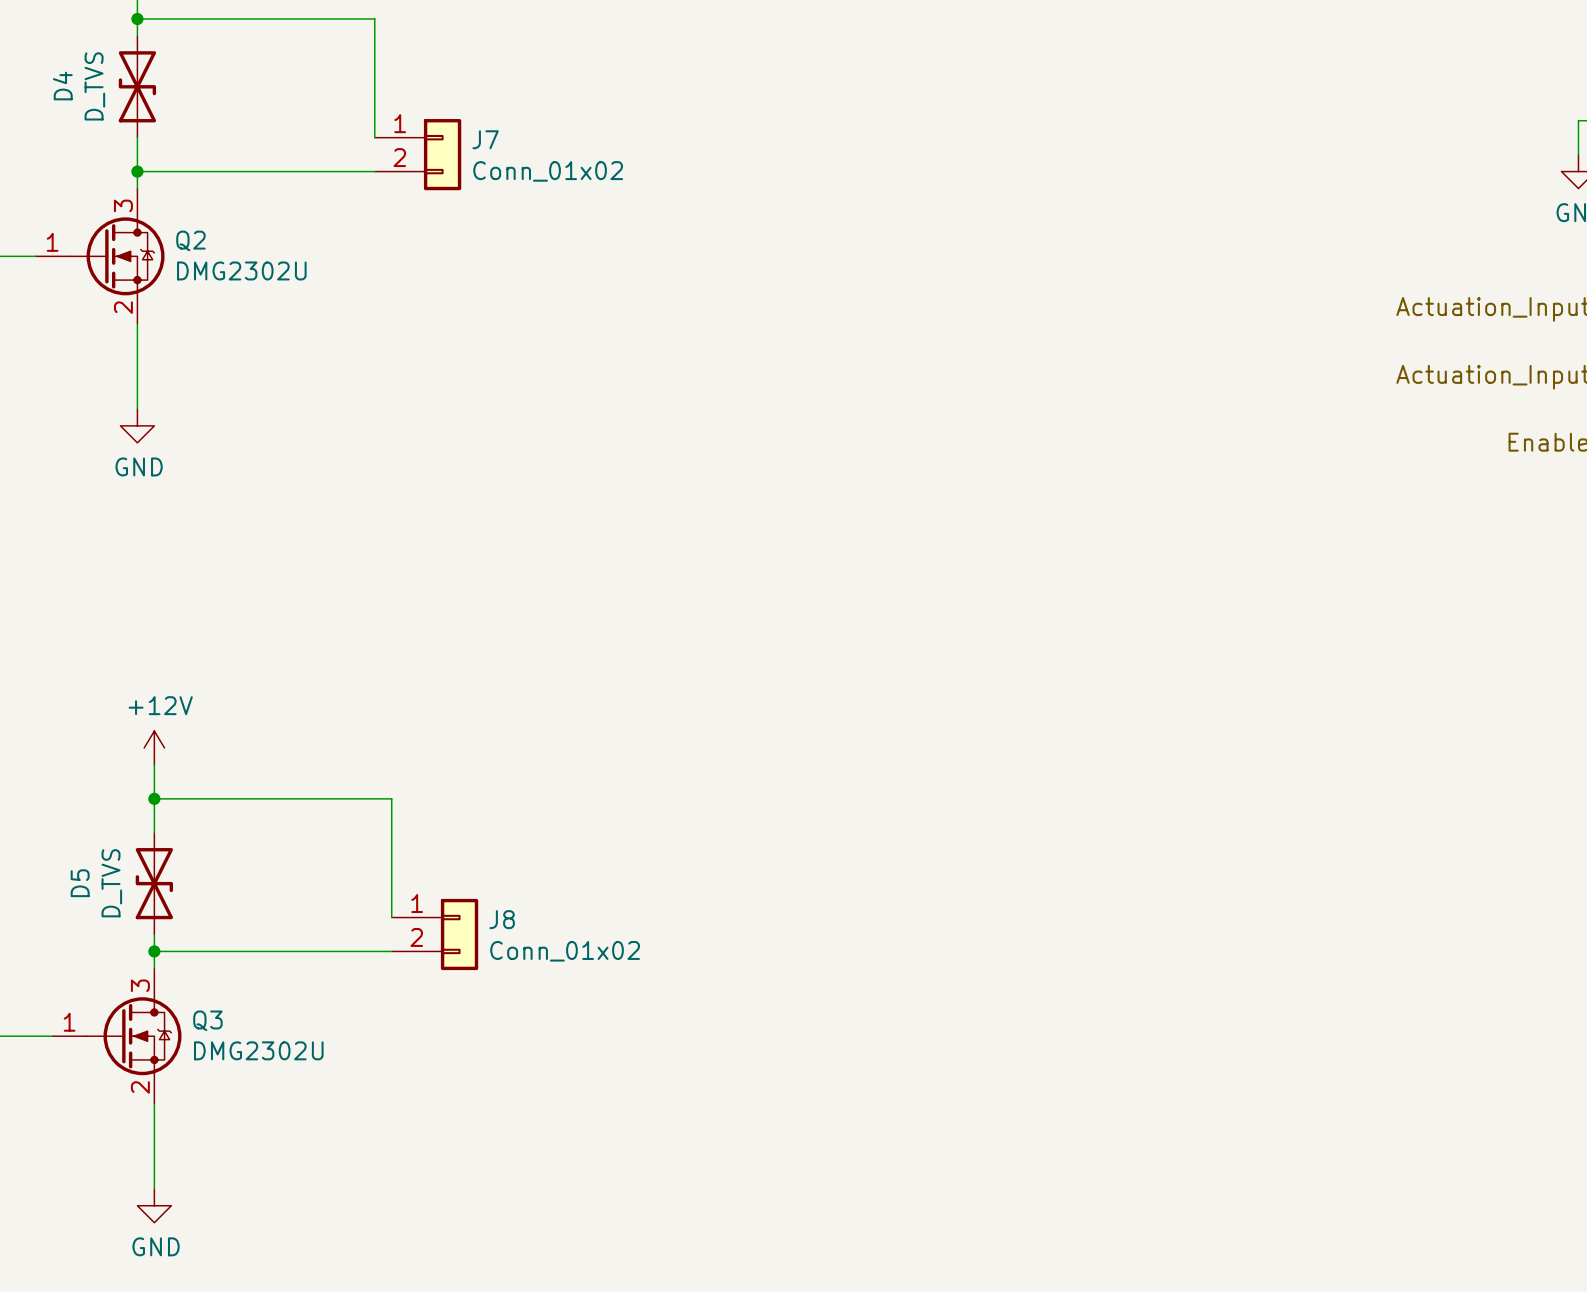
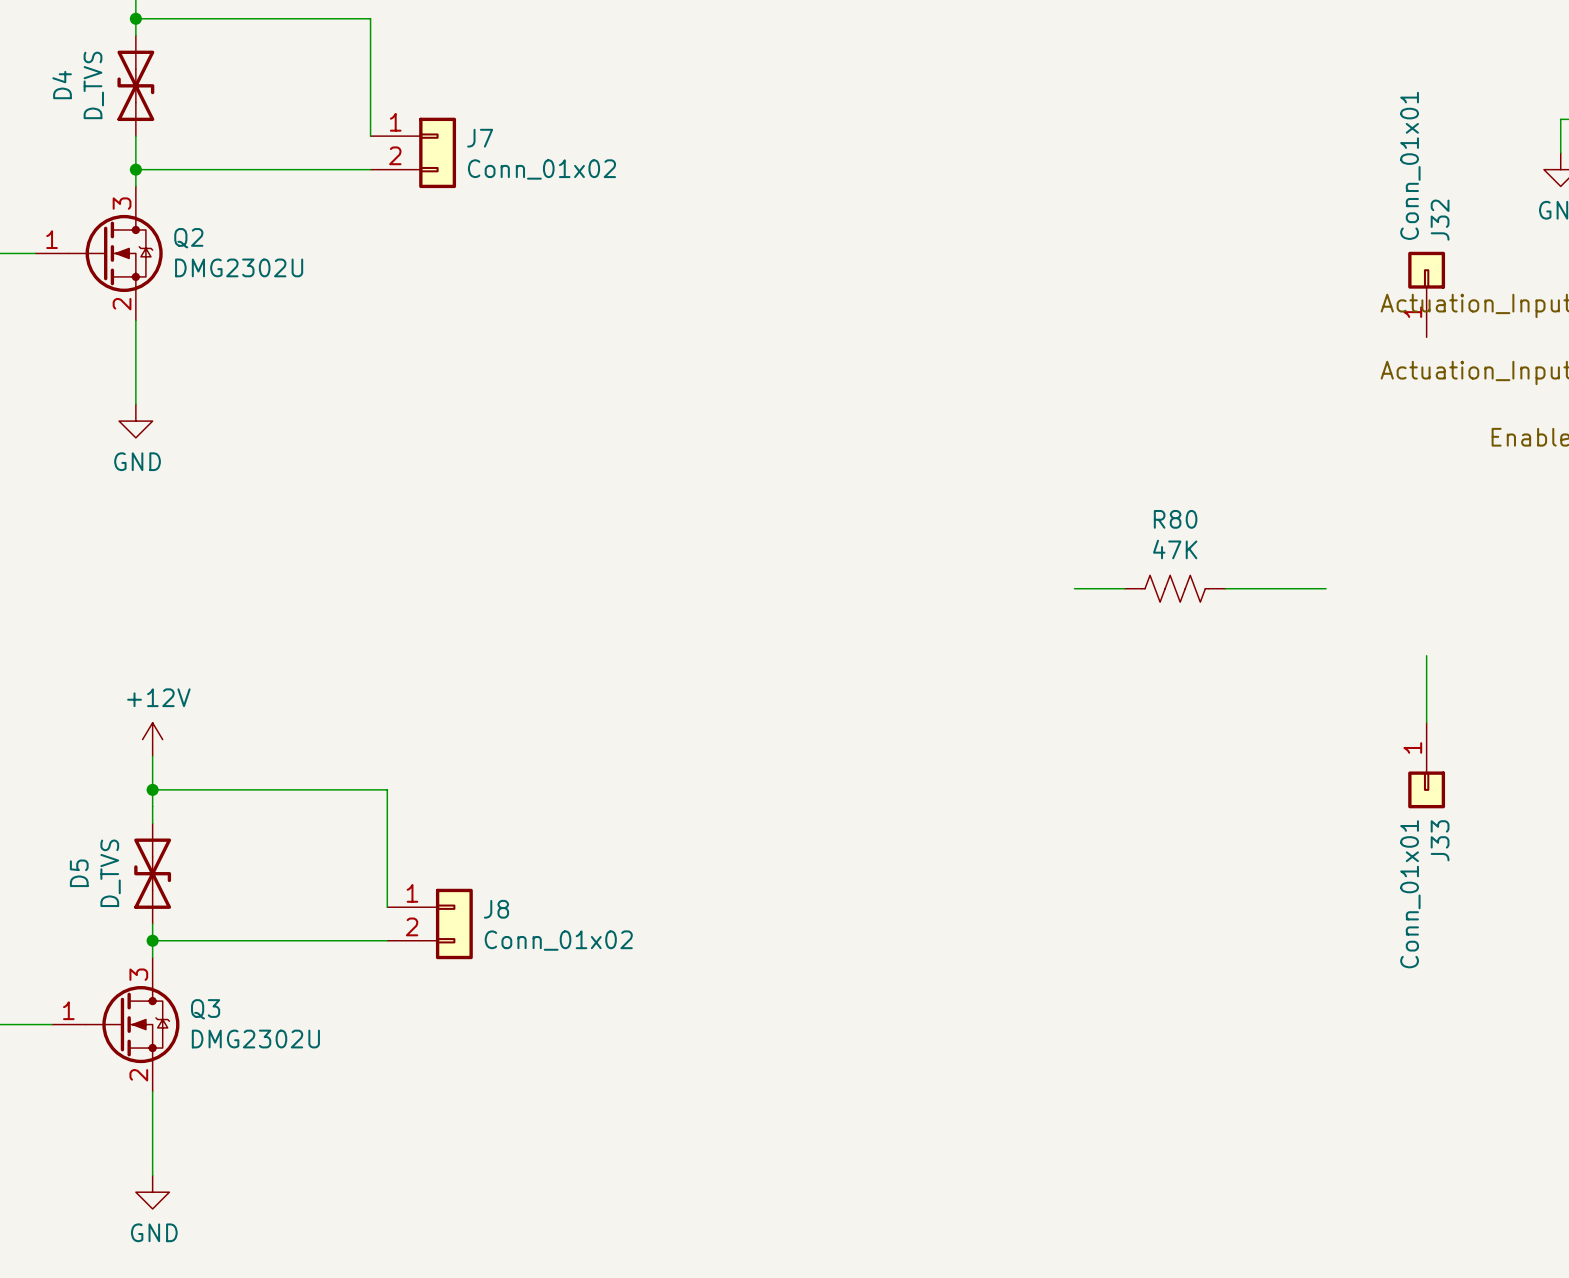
J32: none -> Conn_01x01 (1426, 294)
wire: none -> (1074, 588) (1124, 588)
R80: none -> 47K (1175, 588)
wire: none -> (1225, 588) (1326, 588)
wire: none -> (1426, 655) (1426, 722)
J33: none -> Conn_01x01 (1426, 765)

